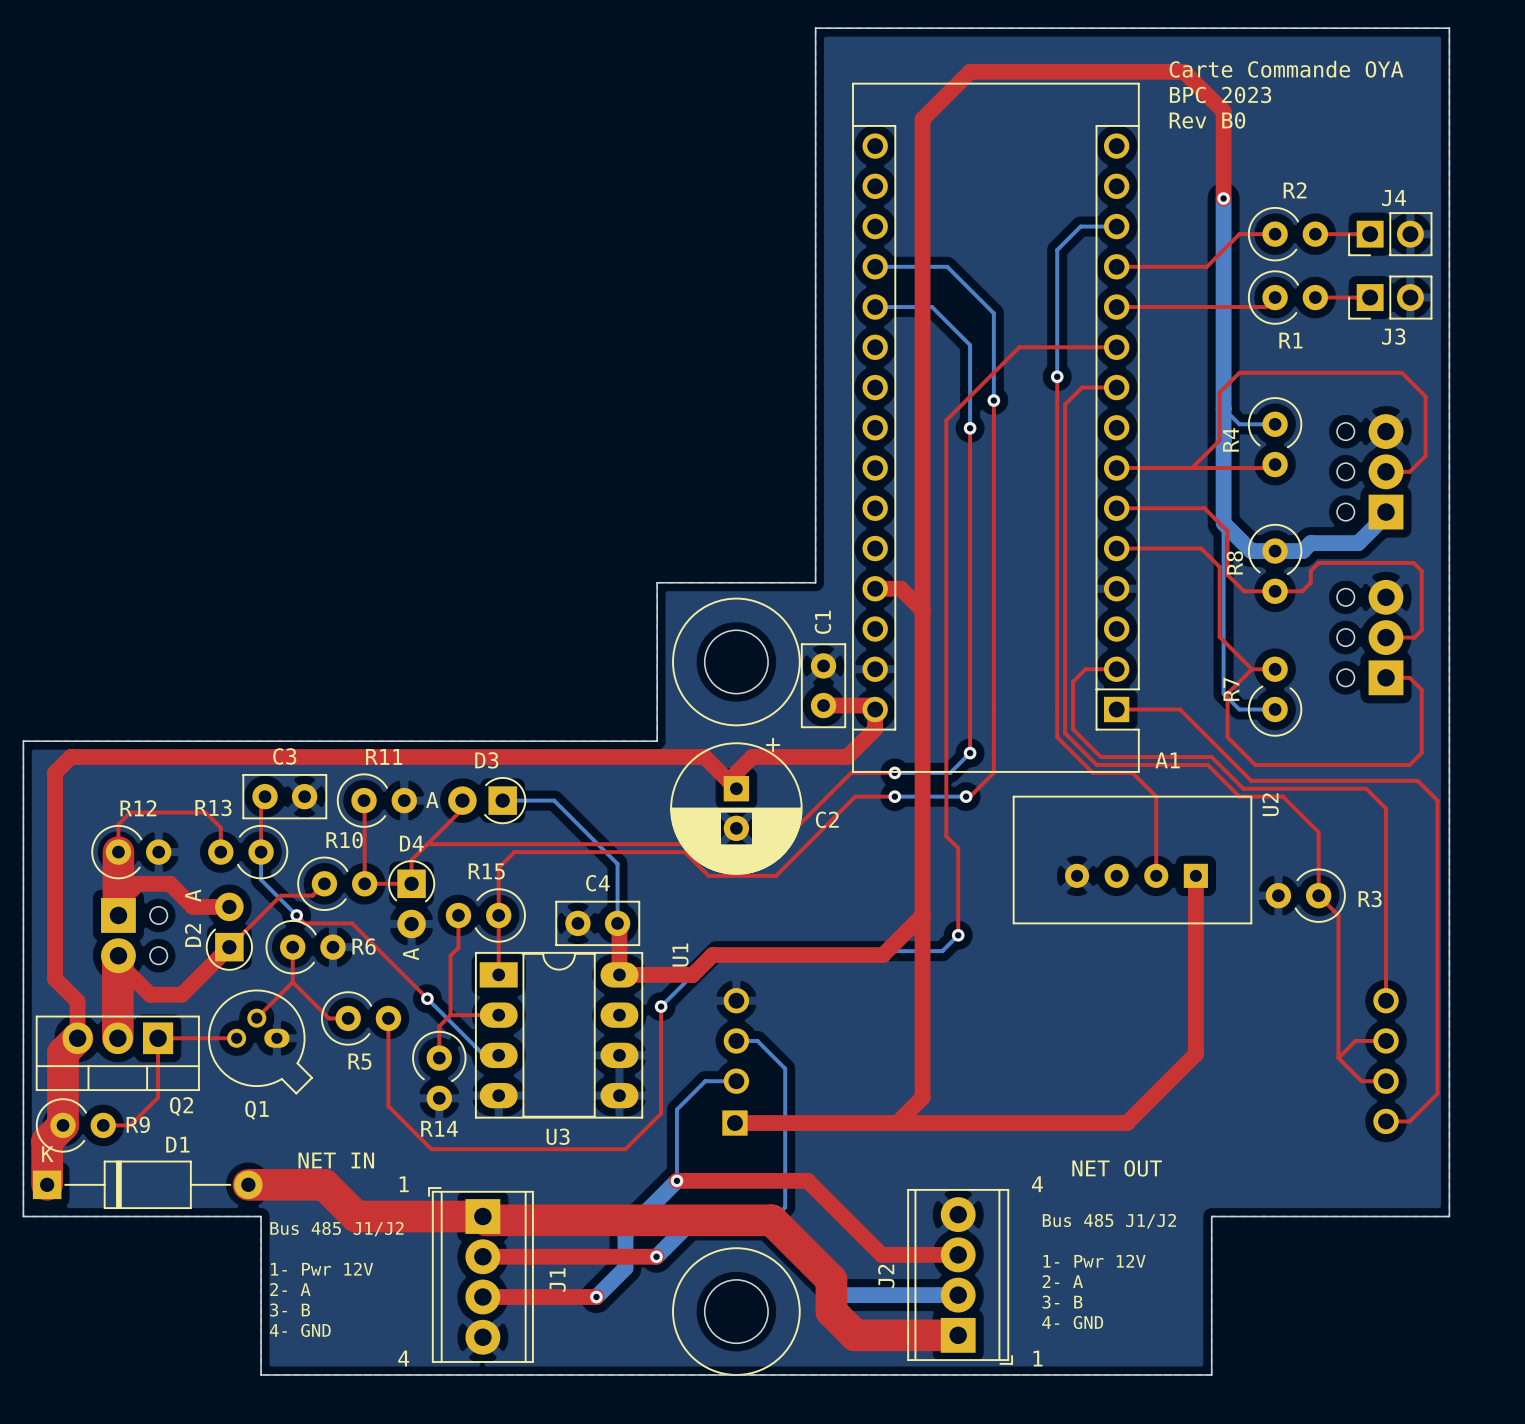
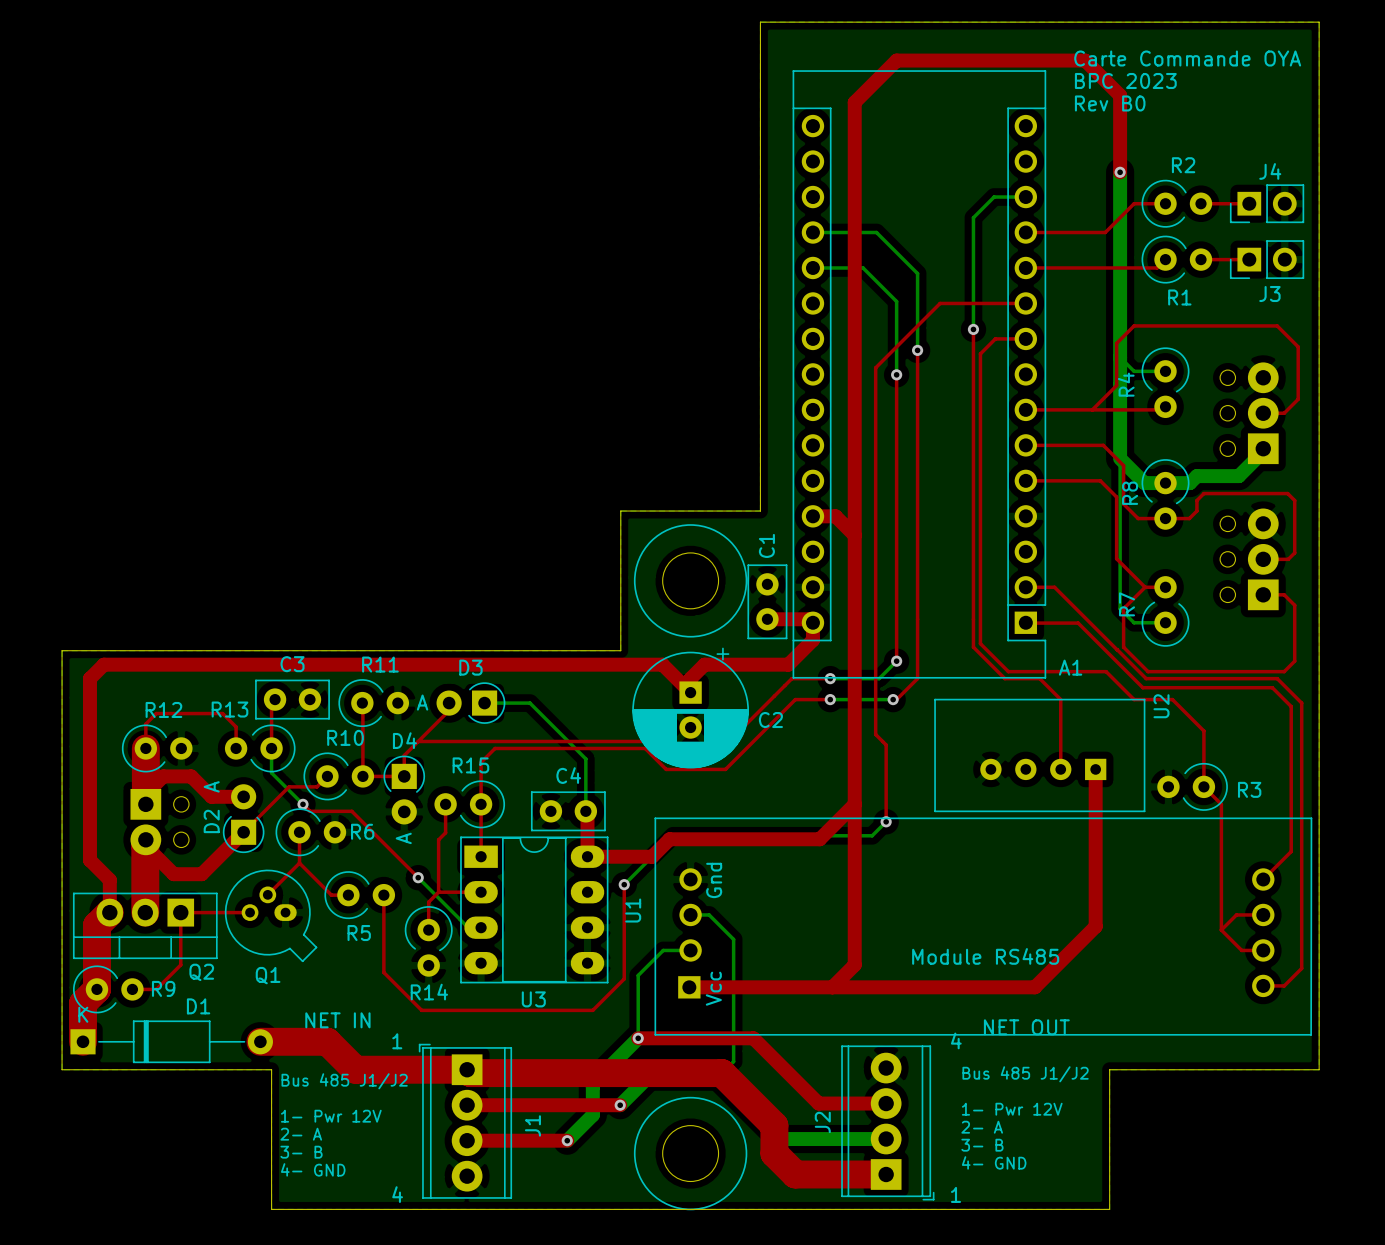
top track: (1116, 669) (1085, 669) (1073, 681) (1073, 729) (1100, 757) (1211, 757) (1243, 788) (1366, 788) (1386, 808) (1386, 1000) -> (1025, 622) (1078, 623) (1142, 687) (1272, 687) (1291, 706) (1291, 851) (1263, 879)
top track: none -> (1025, 587) (1054, 587) (1117, 649)
top track: (1116, 709) (1180, 709) (1251, 780) (1417, 780) (1437, 800) (1437, 1093) (1429, 1101) -> (1117, 649) (1146, 678) (1277, 678) (1301, 703) (1301, 968)
U1 name position: U1 (680, 955) -> U1 (633, 910)
U1 footprint: [722, 988, 1399, 1136] -> [654, 817, 1313, 1036]

